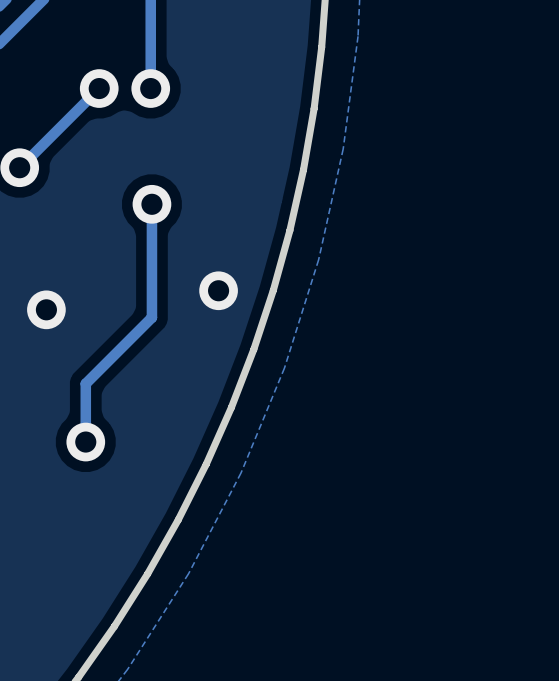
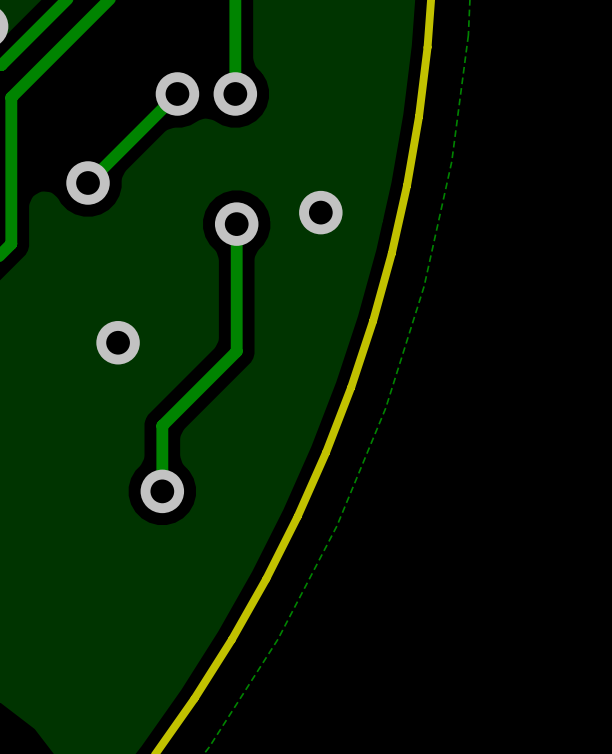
via position: (218, 290) -> (320, 212)

